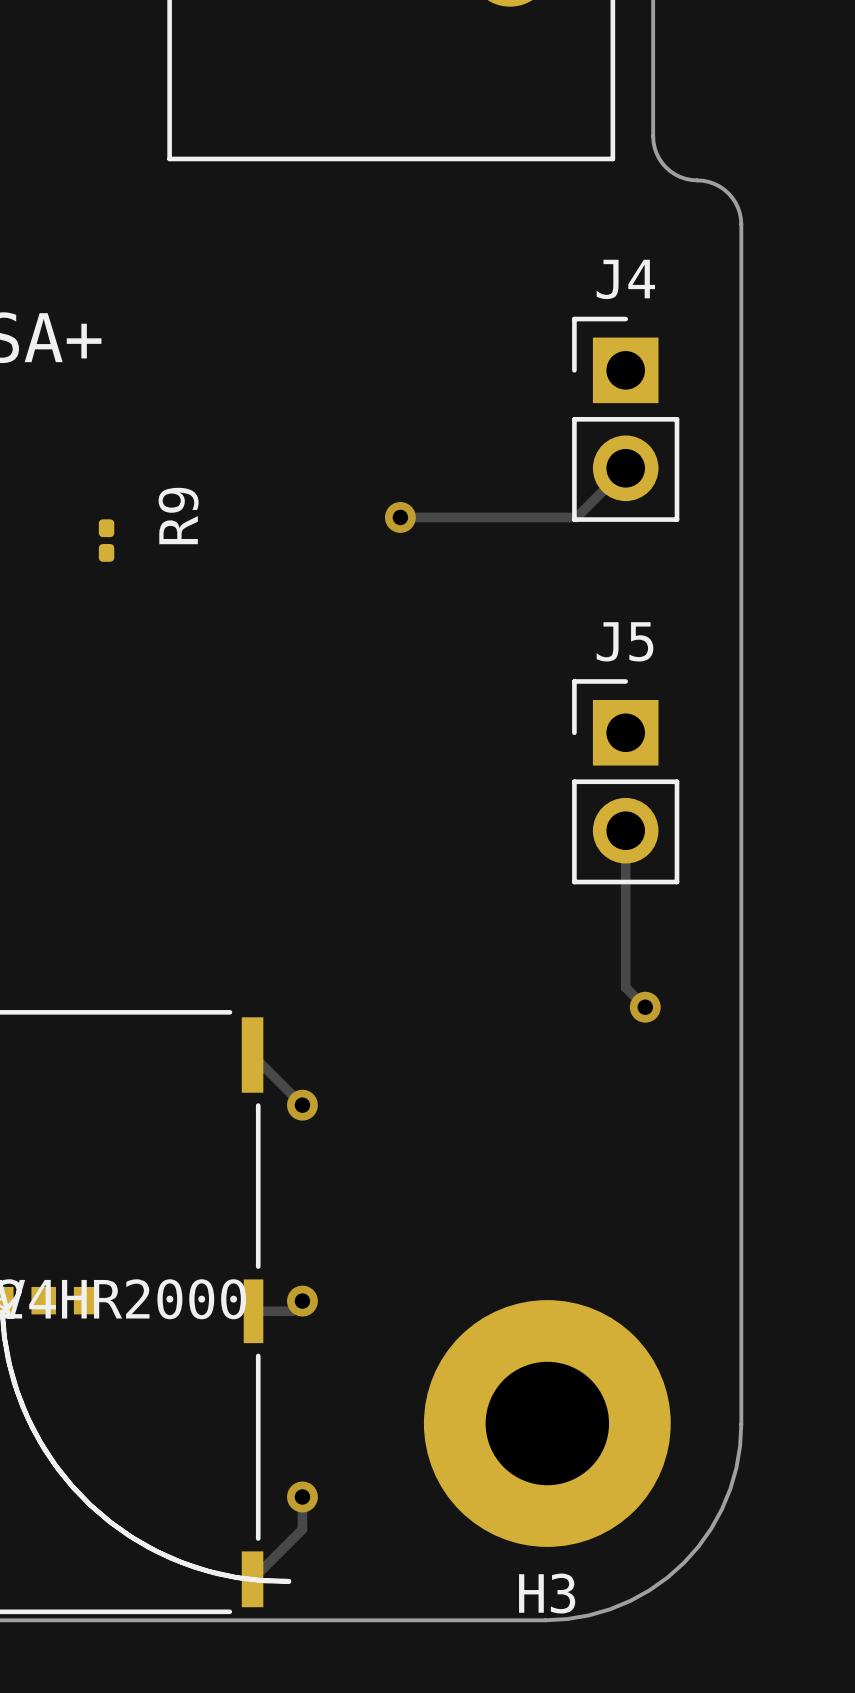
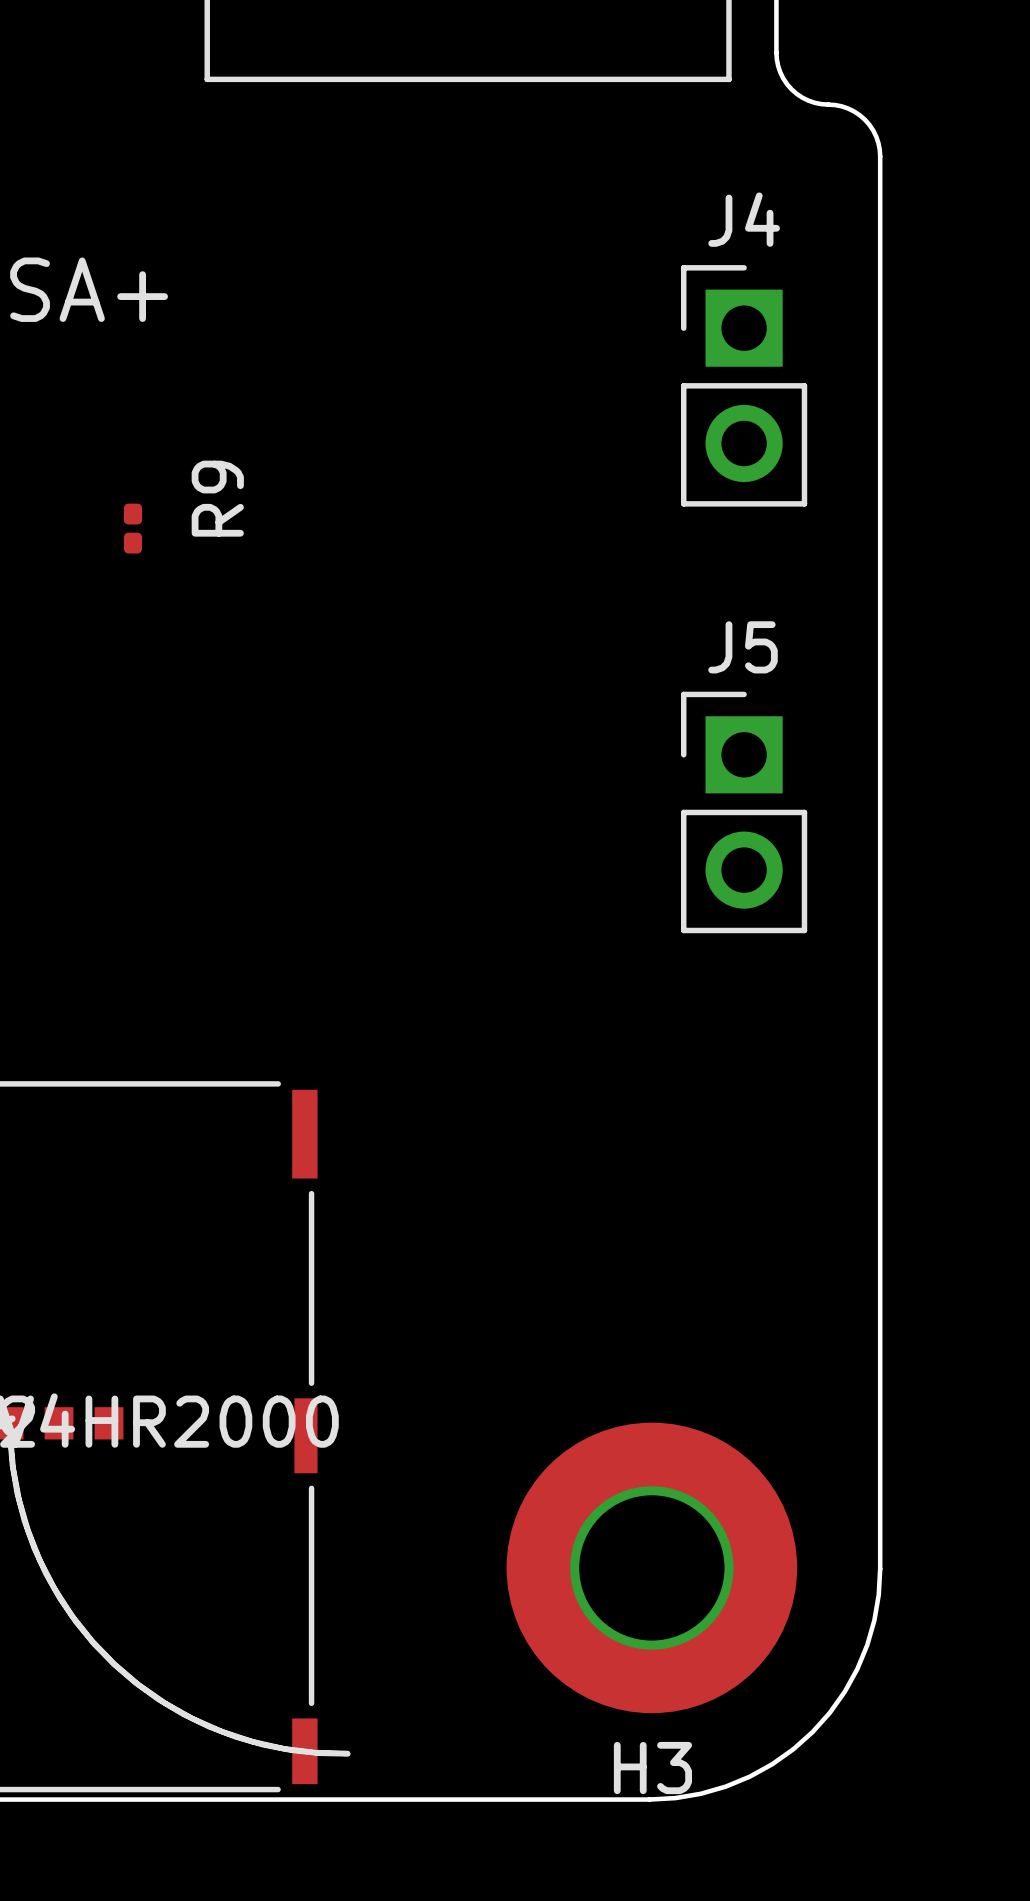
track: (625, 468) (576, 517) (400, 517) -> none
via: (400, 517) -> none
track: (625, 830) (625, 987) (645, 1007) -> none
via: (645, 1007) -> none
track: (252, 1055) (302, 1105) -> none
via: (302, 1105) -> none
track: (302, 1301) (292, 1311) (253, 1311) -> none
via: (302, 1301) -> none
track: (302, 1496) (302, 1529) (252, 1579) -> none
via: (302, 1496) -> none

